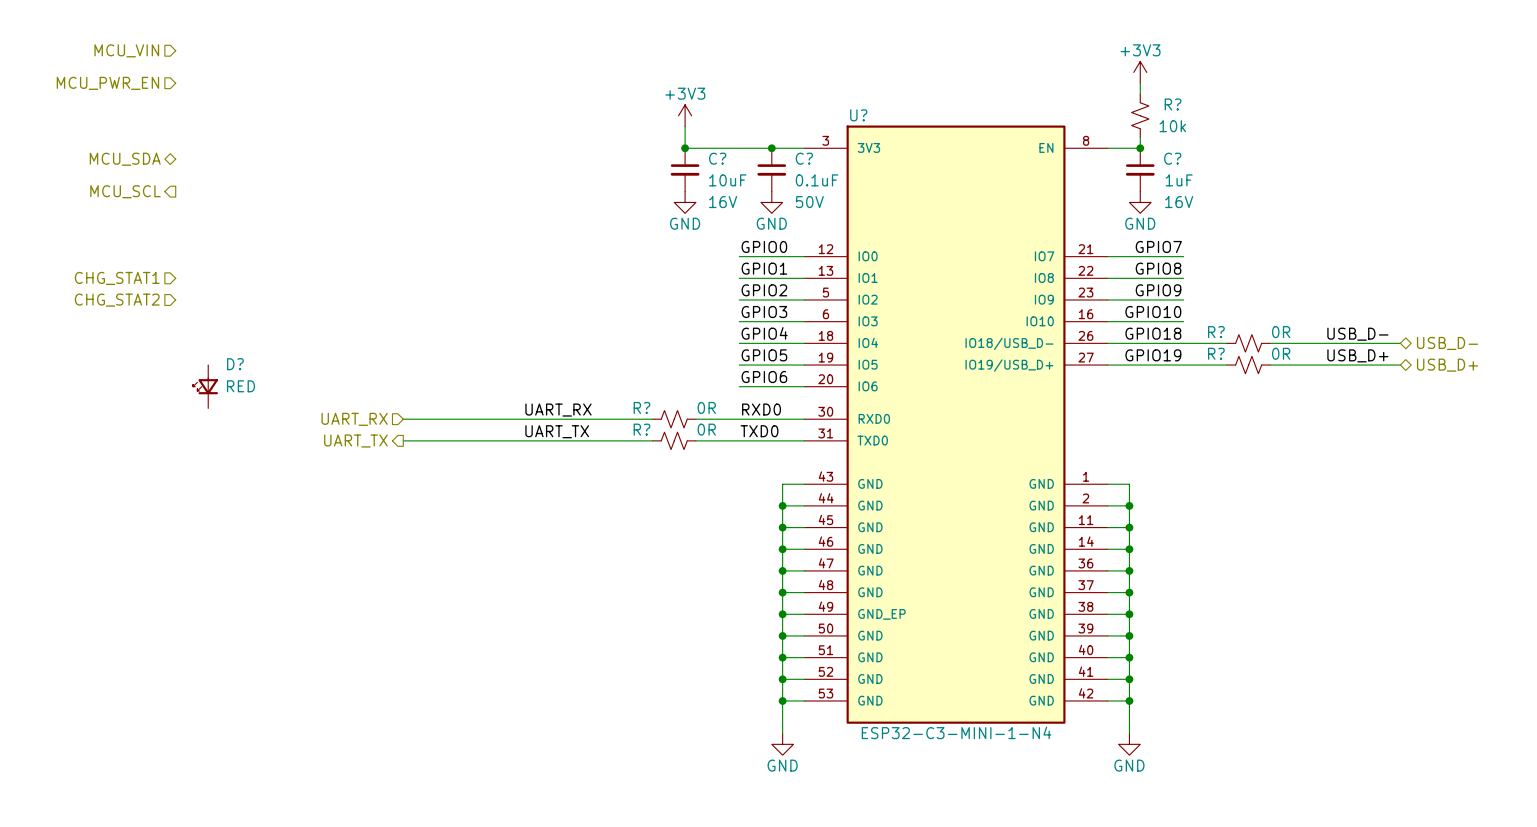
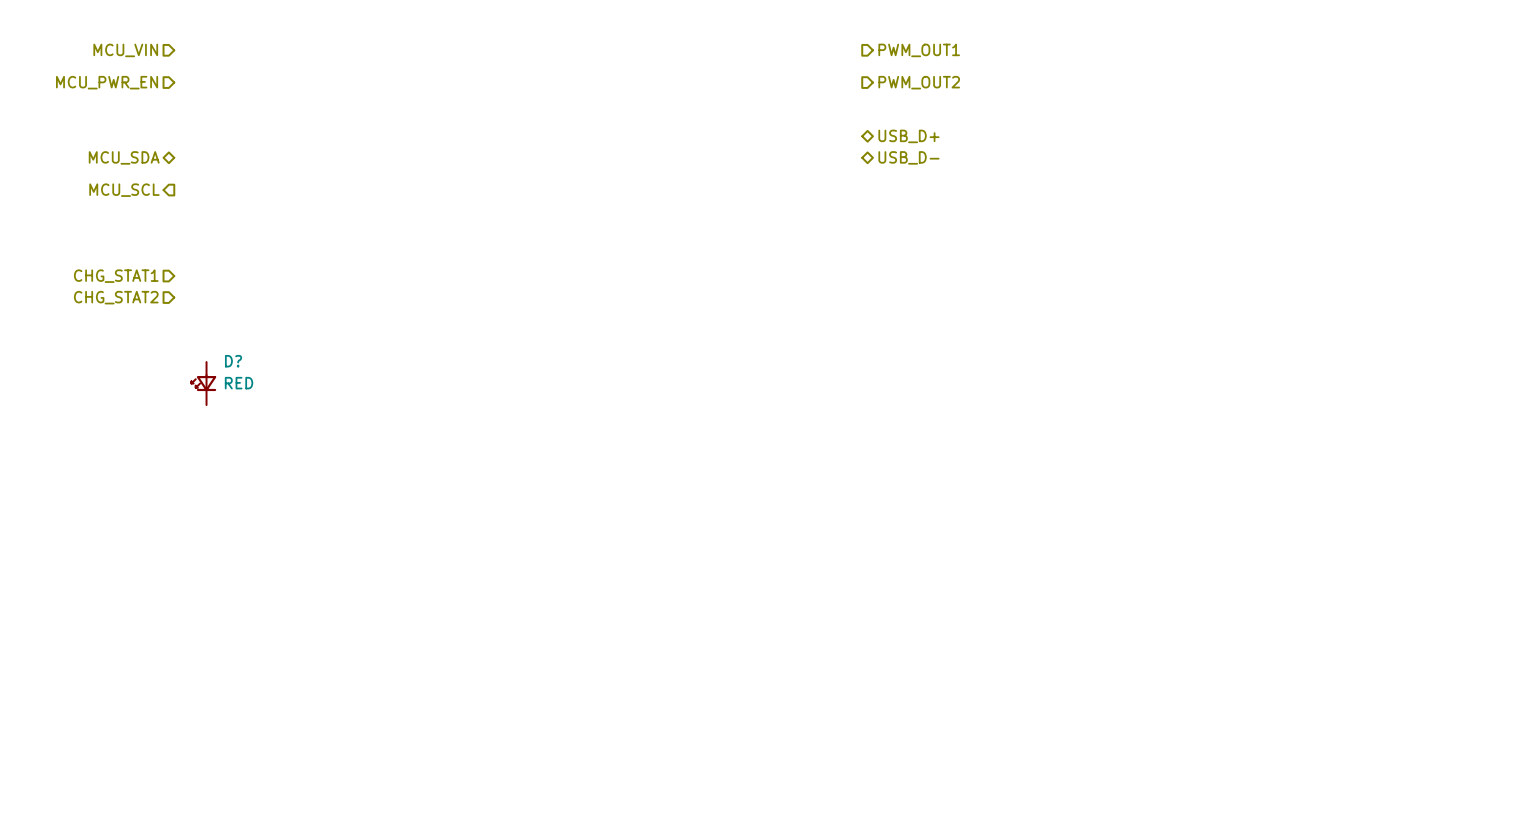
hierarchical label: none -> PWM_OUT1 (919, 50)
power symbol: +3V3 (1140, 72) -> none
hierarchical label: none -> PWM_OUT2 (919, 82)
wire: (1140, 83) (1140, 94) -> none
power symbol: +3V3 (685, 115) -> none
R?: 10k (1140, 115) -> none
wire: (685, 126) (685, 148) (804, 148) -> none
hierarchical label: none -> USB_D+ (908, 136)
wire: (1140, 137) (1140, 148) (1107, 148) -> none
junction: (685, 148) -> none
junction: (771, 148) -> none
junction: (1140, 148) -> none
hierarchical label: none -> USB_D- (908, 157)
C?: 10uF (685, 169) -> none
C?: 0.1uF (771, 169) -> none
C?: 1uF (1140, 169) -> none
power symbol: GND (685, 202) -> none
power symbol: GND (771, 202) -> none
power symbol: GND (1140, 202) -> none
label: GPIO0 (764, 246) -> none
label: GPIO7 (1158, 246) -> none
wire: (739, 256) (804, 256) -> none
wire: (1107, 256) (1183, 256) -> none
label: GPIO1 (764, 268) -> none
label: GPIO8 (1158, 268) -> none
wire: (739, 278) (804, 278) -> none
wire: (1107, 278) (1183, 278) -> none
label: GPIO2 (764, 290) -> none
label: GPIO9 (1158, 290) -> none
wire: (739, 299) (804, 299) -> none
wire: (1107, 299) (1183, 299) -> none
label: GPIO3 (764, 312) -> none
label: GPIO10 (1153, 312) -> none
wire: (739, 321) (804, 321) -> none
wire: (1107, 321) (1183, 321) -> none
label: GPIO4 (764, 333) -> none
label: GPIO18 (1153, 333) -> none
label: USB_D- (1357, 334) -> none
wire: (739, 343) (804, 343) -> none
wire: (1107, 343) (1226, 343) -> none
R?: 0R (1248, 343) -> none
wire: (1270, 343) (1400, 343) -> none
hierarchical label: USB_D- (1447, 343) -> none
label: GPIO5 (764, 355) -> none
label: GPIO19 (1153, 355) -> none
label: USB_D+ (1357, 355) -> none
wire: (739, 365) (804, 365) -> none
wire: (1107, 365) (1226, 365) -> none
R?: 0R (1248, 365) -> none
wire: (1270, 365) (1400, 365) -> none
hierarchical label: USB_D+ (1447, 365) -> none
label: GPIO6 (764, 377) -> none
wire: (739, 386) (804, 386) -> none
label: RXD0 (761, 409) -> none
label: UART_RX (558, 410) -> none
hierarchical label: UART_RX (354, 419) -> none
wire: (403, 419) (652, 419) -> none
R?: 0R (674, 419) -> none
wire: (695, 419) (804, 419) -> none
U?: ESP32-C3-MINI-1-N4 (956, 424) -> none
label: UART_TX (557, 431) -> none
label: TXD0 (759, 431) -> none
wire: (403, 440) (652, 440) -> none
R?: 0R (674, 440) -> none
wire: (695, 440) (804, 440) -> none
hierarchical label: UART_TX (355, 441) -> none
wire: (804, 484) (782, 484) (782, 733) -> none
wire: (1107, 484) (1129, 484) (1129, 733) -> none
wire: (782, 505) (804, 505) -> none
junction: (782, 505) -> none
wire: (1107, 505) (1129, 505) -> none
junction: (1129, 505) -> none
wire: (782, 527) (804, 527) -> none
junction: (782, 527) -> none
wire: (1107, 527) (1129, 527) -> none
junction: (1129, 527) -> none
wire: (782, 549) (804, 549) -> none
junction: (782, 549) -> none
wire: (1107, 549) (1129, 549) -> none
junction: (1129, 549) -> none
wire: (782, 570) (804, 570) -> none
junction: (782, 570) -> none
wire: (1107, 570) (1129, 570) -> none
junction: (1129, 570) -> none
wire: (782, 592) (804, 592) -> none
junction: (782, 592) -> none
wire: (1107, 592) (1129, 592) -> none
junction: (1129, 592) -> none
wire: (782, 614) (804, 614) -> none
junction: (782, 614) -> none
wire: (1107, 614) (1129, 614) -> none
junction: (1129, 614) -> none
wire: (782, 635) (804, 635) -> none
junction: (782, 635) -> none
wire: (1107, 635) (1129, 635) -> none
junction: (1129, 635) -> none
wire: (782, 657) (804, 657) -> none
junction: (782, 657) -> none
wire: (1107, 657) (1129, 657) -> none
junction: (1129, 657) -> none
wire: (782, 679) (804, 679) -> none
junction: (782, 679) -> none
wire: (1107, 679) (1129, 679) -> none
junction: (1129, 679) -> none
wire: (782, 700) (804, 700) -> none
junction: (782, 700) -> none
wire: (1107, 700) (1129, 700) -> none
junction: (1129, 700) -> none
power symbol: GND (782, 744) -> none
power symbol: GND (1129, 744) -> none

